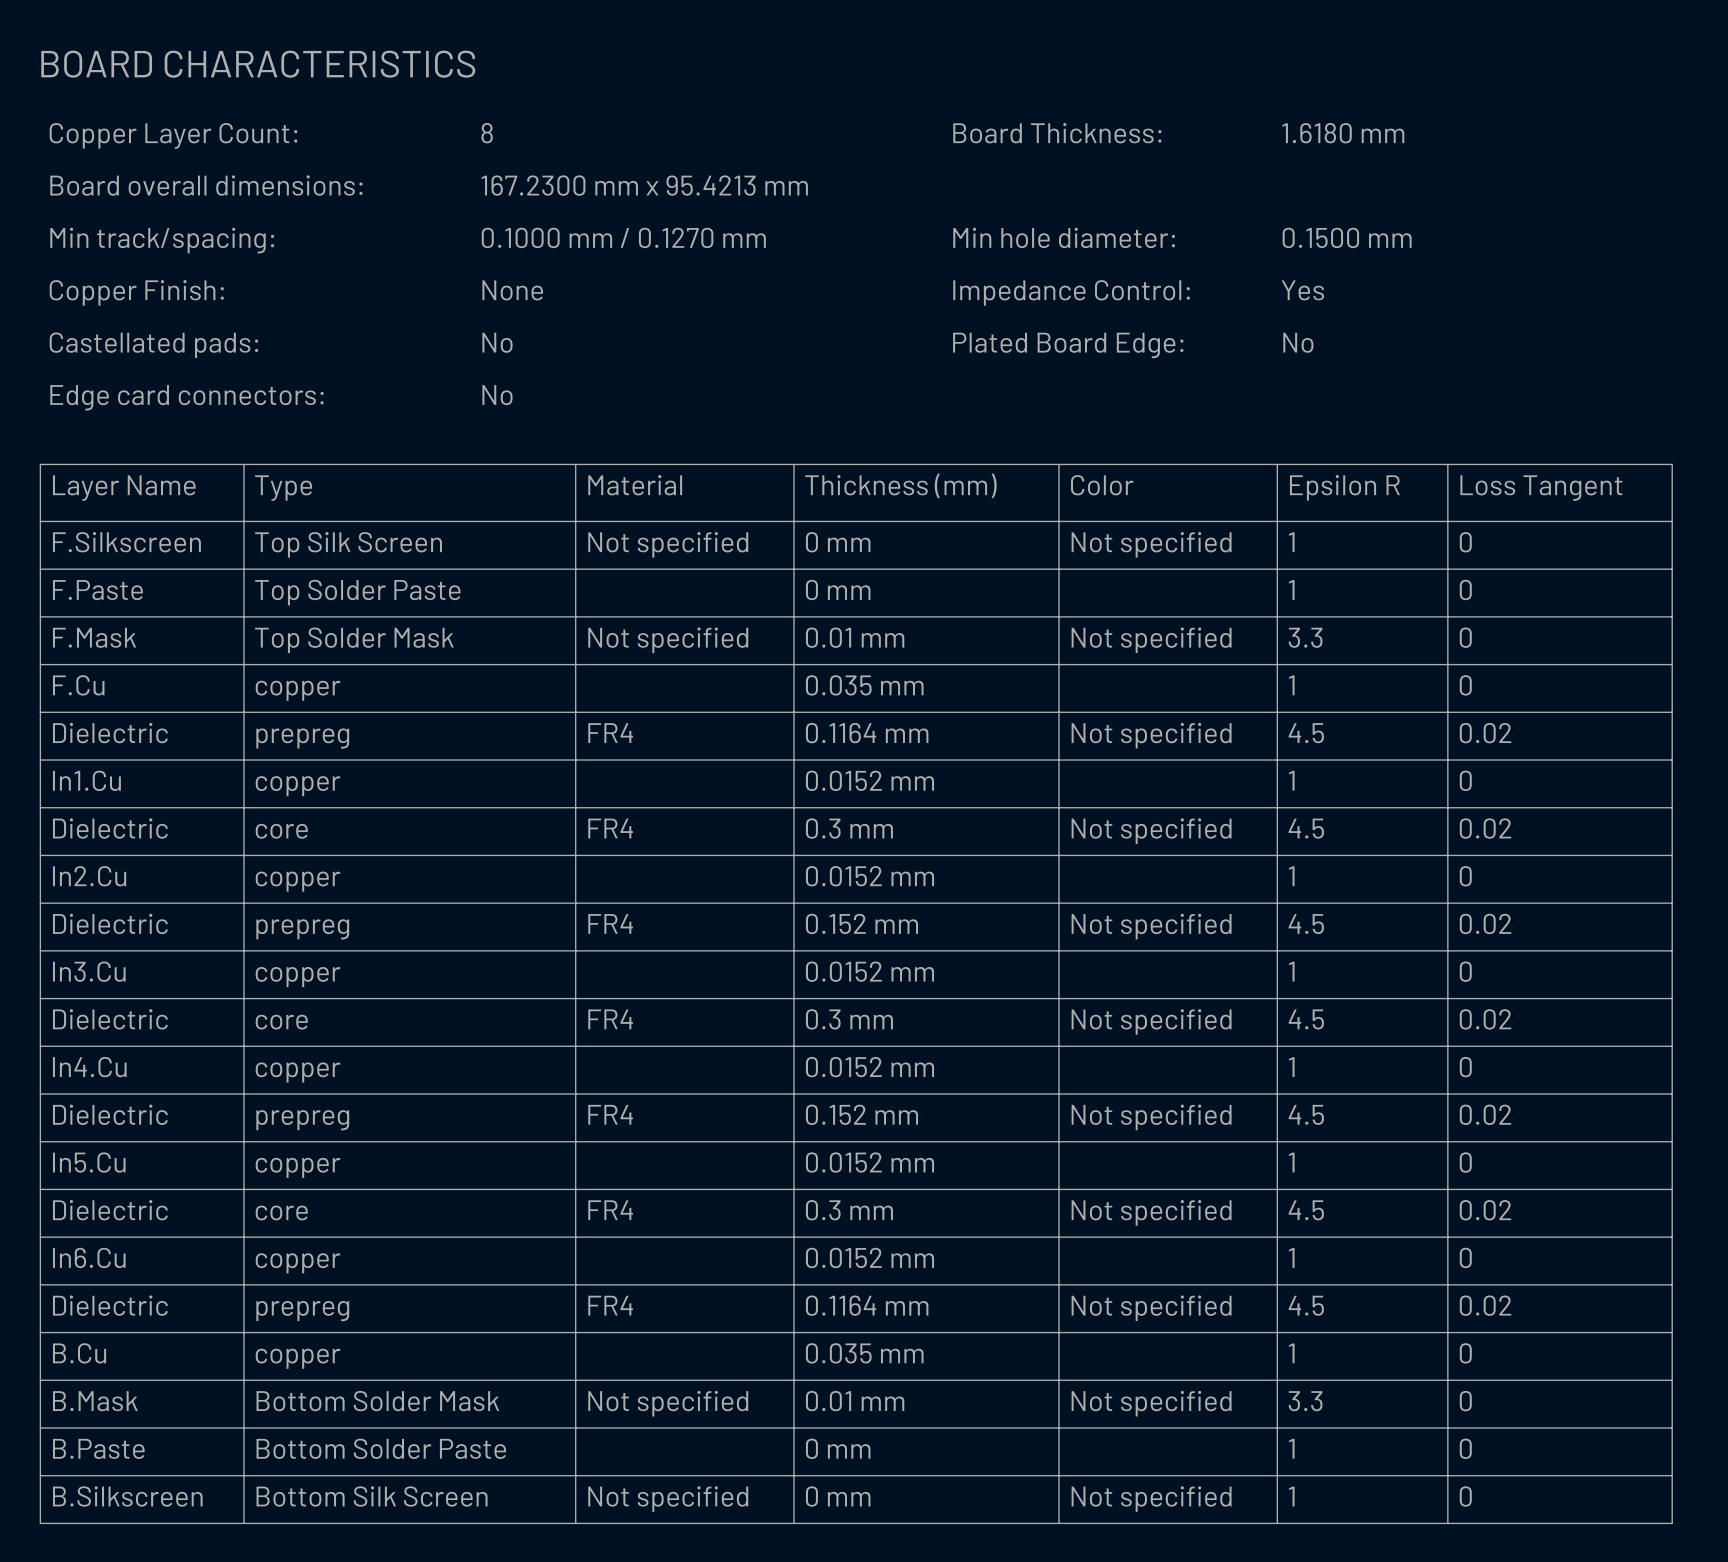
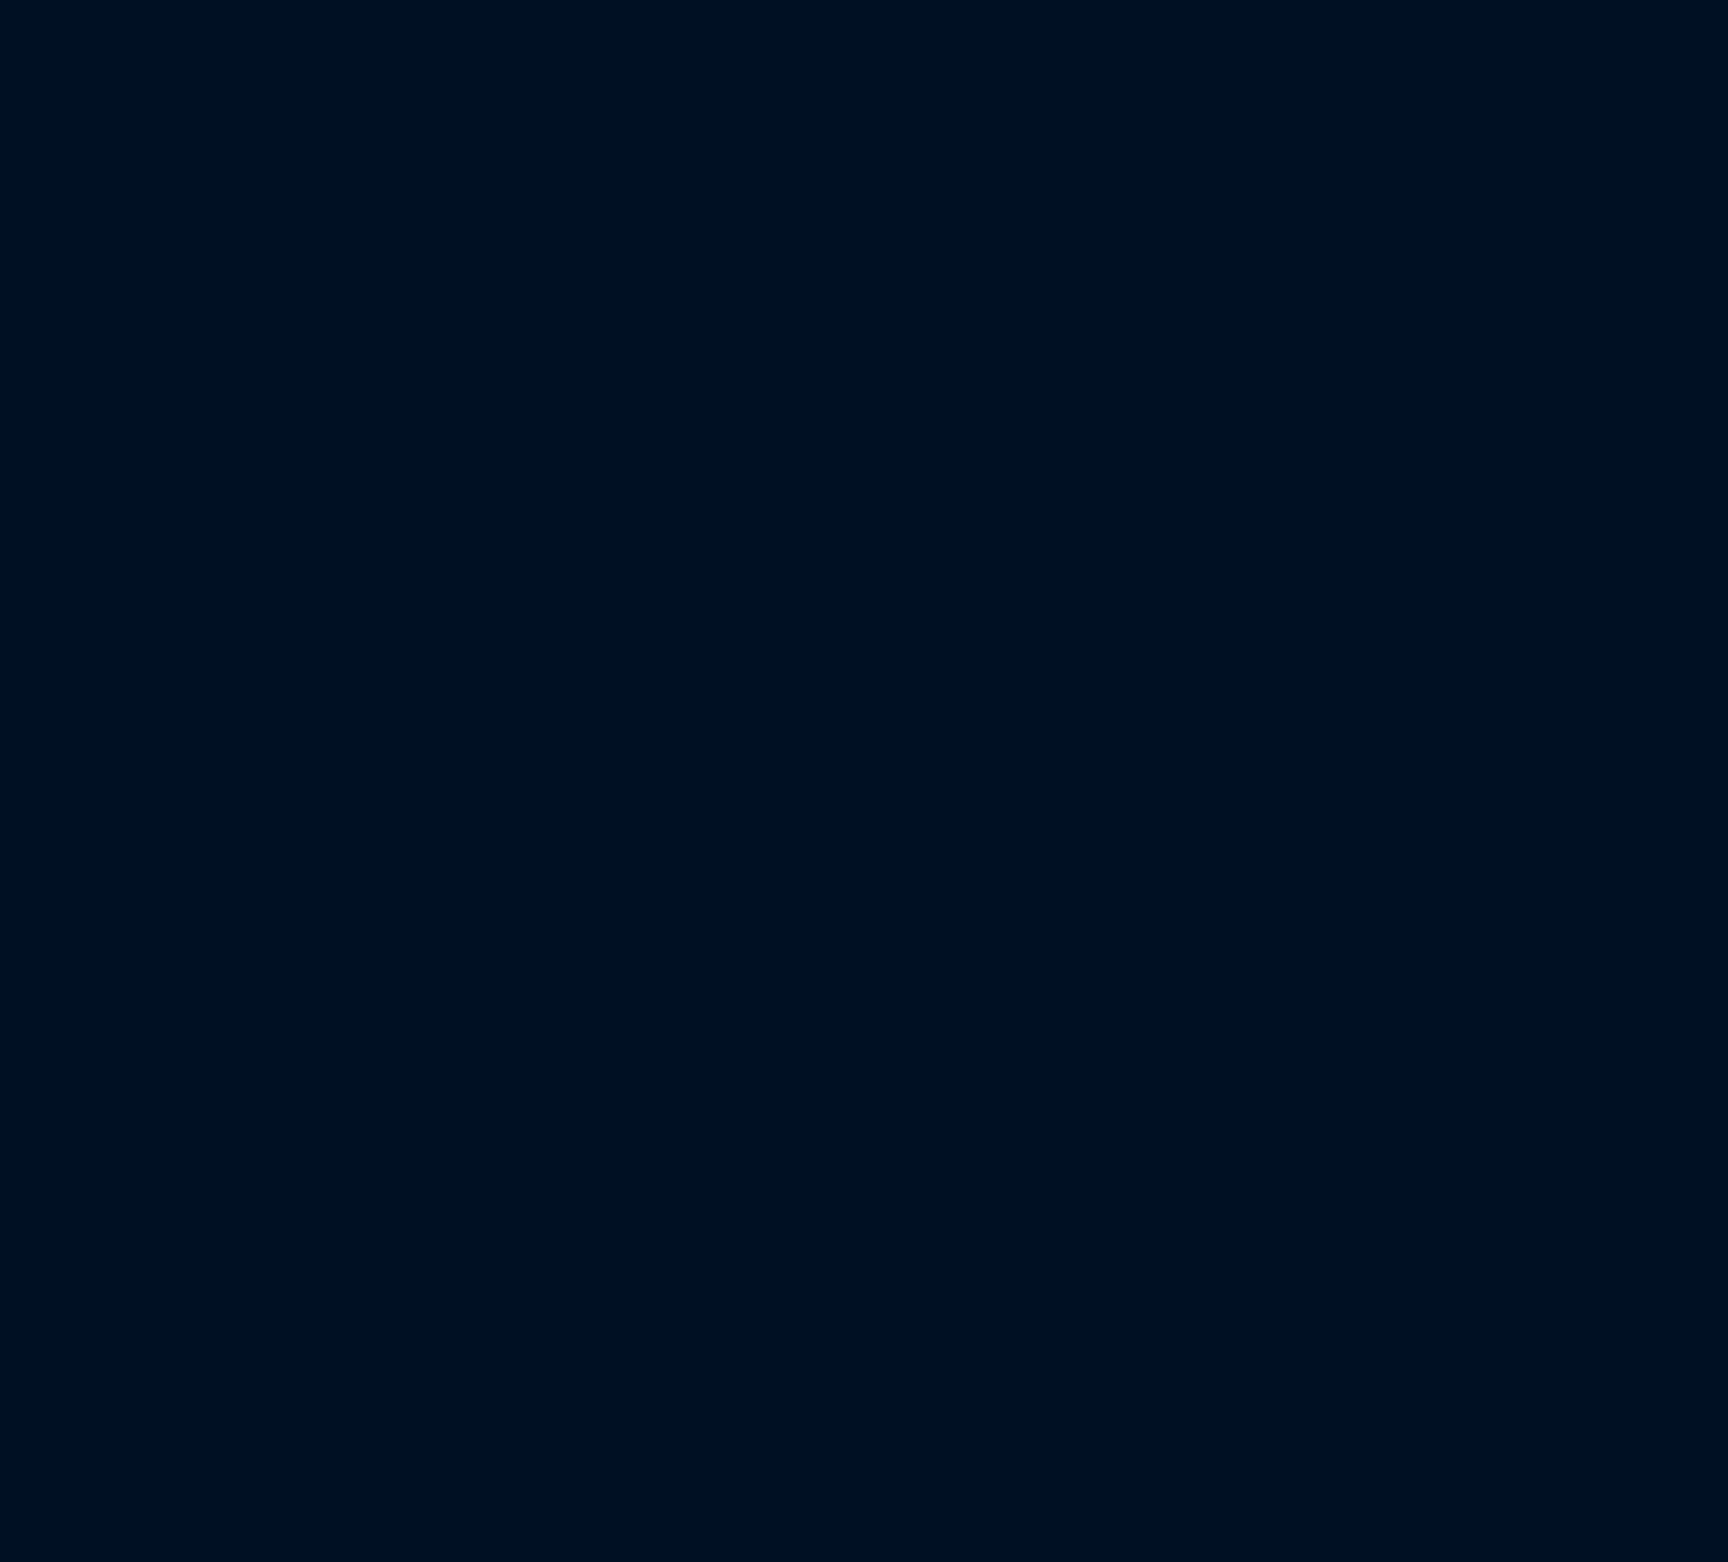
text: BOARD CHARACTERISTICS (258, 64) -> none
text: 8 (487, 133) -> none
text: Board Thickness: (1057, 133) -> none
text: 1.6180 mm (1343, 133) -> none
text: Copper Layer Count: (173, 135) -> none
text: Board overall dimensions: (206, 185) -> none
text: 167.2300 mm x 95.4213 mm (644, 185) -> none
text: 0.1000 mm / 0.1270 mm (623, 237) -> none
text: Min hole diameter: (1064, 237) -> none
text: 0.1500 mm (1347, 237) -> none
text: Min track/spacing: (162, 240) -> none
text: None (512, 290) -> none
text: Yes (1302, 290) -> none
text: Copper Finish: (136, 292) -> none
text: Impedance Control: (1071, 292) -> none
text: No (497, 342) -> none
text: No (1298, 342) -> none
text: Castellated pads: (153, 345) -> none
text: Plated Board Edge: (1068, 345) -> none
text: No (497, 395) -> none
text: Edge card connectors: (186, 397) -> none
line: (40, 464) (40, 1523) (1672, 1523) (1672, 464) (40, 464) -> none
line: (243, 464) (243, 1523) -> none
line: (575, 464) (575, 1523) -> none
line: (794, 464) (794, 1523) -> none
line: (1059, 464) (1059, 1523) -> none
line: (1277, 464) (1277, 1523) -> none
line: (1447, 464) (1447, 1523) -> none
text: Material (635, 485) -> none
text: Thickness (mm) (900, 485) -> none
text: Color (1102, 485) -> none
text: Epsilon R (1344, 487) -> none
text: Layer Name (124, 488) -> none
text: Type (283, 488) -> none
text: Loss Tangent (1541, 488) -> none
line: (40, 521) (1672, 521) -> none
text: F.Silkscreen (126, 542) -> none
text: 0 mm (838, 542) -> none
text: 1 (1291, 542) -> none
text: 0 (1465, 542) -> none
text: Top Silk Screen (348, 544) -> none
text: Not specified (668, 544) -> none
text: Not specified (1151, 544) -> none
line: (40, 569) (1672, 569) -> none
text: 0 mm (838, 589) -> none
text: 1 (1291, 589) -> none
text: 0 (1465, 589) -> none
text: F.Paste (97, 590) -> none
text: Top Solder Paste (357, 592) -> none
line: (40, 616) (1672, 616) -> none
text: F.Mask (94, 637) -> none
text: 0.01 mm (855, 637) -> none
text: 3.3 (1305, 637) -> none
text: 0 (1465, 637) -> none
text: Top Solder Mask (354, 640) -> none
text: Not specified (668, 640) -> none
text: Not specified (1151, 640) -> none
line: (40, 664) (1672, 664) -> none
text: F.Cu (78, 685) -> none
text: 0.035 mm (864, 685) -> none
text: 1 (1291, 685) -> none
text: 0 (1465, 685) -> none
text: copper (298, 690) -> none
line: (40, 712) (1672, 712) -> none
text: Dielectric (110, 733) -> none
text: FR4 (610, 733) -> none
text: 0.1164 mm (867, 733) -> none
text: 4.5 (1306, 733) -> none
text: 0.02 (1485, 733) -> none
text: Not specified (1151, 735) -> none
text: prepreg (302, 738) -> none
line: (40, 760) (1672, 760) -> none
text: In1.Cu (86, 780) -> none
text: 0.0152 mm (869, 780) -> none
text: 1 (1291, 780) -> none
text: 0 (1465, 780) -> none
text: copper (298, 786) -> none
line: (40, 807) (1672, 807) -> none
text: Dielectric (110, 828) -> none
text: FR4 (610, 828) -> none
text: 0.3 mm (849, 828) -> none
text: 4.5 (1306, 828) -> none
text: 0.02 (1485, 828) -> none
text: core (281, 831) -> none
text: Not specified (1151, 831) -> none
line: (40, 855) (1672, 855) -> none
text: In2.Cu (89, 876) -> none
text: 0.0152 mm (869, 876) -> none
text: 1 (1291, 876) -> none
text: 0 (1465, 876) -> none
text: copper (298, 881) -> none
line: (40, 903) (1672, 903) -> none
text: Dielectric (110, 923) -> none
text: FR4 (610, 923) -> none
text: 0.152 mm (861, 923) -> none
text: 0.02 (1485, 923) -> none
text: 4.5 (1306, 924) -> none
text: Not specified (1151, 926) -> none
text: prepreg (302, 929) -> none
line: (40, 950) (1672, 950) -> none
text: In3.Cu (89, 971) -> none
text: 0.0152 mm (869, 971) -> none
text: 1 (1291, 971) -> none
text: 0 (1465, 971) -> none
text: copper (298, 977) -> none
line: (40, 998) (1672, 998) -> none
text: Dielectric (110, 1019) -> none
text: FR4 (610, 1019) -> none
text: 0.3 mm (849, 1019) -> none
text: 4.5 (1306, 1019) -> none
text: 0.02 (1485, 1019) -> none
text: Not specified (1151, 1021) -> none
text: core (281, 1022) -> none
line: (40, 1046) (1672, 1046) -> none
text: In4.Cu (89, 1067) -> none
text: 0.0152 mm (869, 1067) -> none
text: 1 (1291, 1067) -> none
text: 0 (1465, 1067) -> none
text: copper (298, 1072) -> none
line: (40, 1094) (1672, 1094) -> none
text: Dielectric (110, 1114) -> none
text: FR4 (610, 1114) -> none
text: 0.152 mm (861, 1114) -> none
text: 4.5 (1306, 1114) -> none
text: 0.02 (1485, 1114) -> none
text: Not specified (1151, 1117) -> none
text: prepreg (302, 1120) -> none
line: (40, 1141) (1672, 1141) -> none
text: In5.Cu (89, 1162) -> none
text: 0.0152 mm (869, 1162) -> none
text: 1 (1291, 1162) -> none
text: 0 (1465, 1162) -> none
text: copper (298, 1167) -> none
line: (40, 1189) (1672, 1189) -> none
text: Dielectric (110, 1210) -> none
text: FR4 (610, 1210) -> none
text: 0.3 mm (849, 1210) -> none
text: 4.5 (1306, 1210) -> none
text: 0.02 (1485, 1210) -> none
text: core (281, 1212) -> none
text: Not specified (1151, 1212) -> none
line: (40, 1237) (1672, 1237) -> none
text: In6.Cu (89, 1257) -> none
text: 0.0152 mm (869, 1257) -> none
text: 1 (1291, 1257) -> none
text: 0 (1465, 1257) -> none
text: copper (298, 1263) -> none
line: (40, 1284) (1672, 1284) -> none
text: Dielectric (110, 1305) -> none
text: FR4 (610, 1305) -> none
text: 0.1164 mm (867, 1305) -> none
text: 4.5 (1306, 1305) -> none
text: 0.02 (1485, 1305) -> none
text: Not specified (1151, 1308) -> none
text: prepreg (302, 1311) -> none
line: (40, 1332) (1672, 1332) -> none
text: B.Cu (79, 1353) -> none
text: 0.035 mm (864, 1353) -> none
text: 1 (1291, 1353) -> none
text: 0 (1465, 1353) -> none
text: copper (298, 1358) -> none
line: (40, 1380) (1672, 1380) -> none
text: B.Mask (95, 1401) -> none
text: Bottom Solder Mask (377, 1401) -> none
text: 0.01 mm (855, 1401) -> none
text: 3.3 (1305, 1401) -> none
text: 0 (1465, 1401) -> none
text: Not specified (668, 1403) -> none
text: Not specified (1151, 1403) -> none
line: (40, 1428) (1672, 1428) -> none
text: B.Paste (98, 1448) -> none
text: Bottom Solder Paste (381, 1448) -> none
text: 0 mm (838, 1448) -> none
text: 1 (1291, 1448) -> none
text: 0 (1465, 1448) -> none
line: (40, 1475) (1672, 1475) -> none
text: B.Silkscreen (127, 1496) -> none
text: Bottom Silk Screen (372, 1496) -> none
text: 0 mm (838, 1496) -> none
text: 1 (1291, 1496) -> none
text: 0 (1465, 1496) -> none
text: Not specified (668, 1499) -> none
text: Not specified (1151, 1499) -> none

